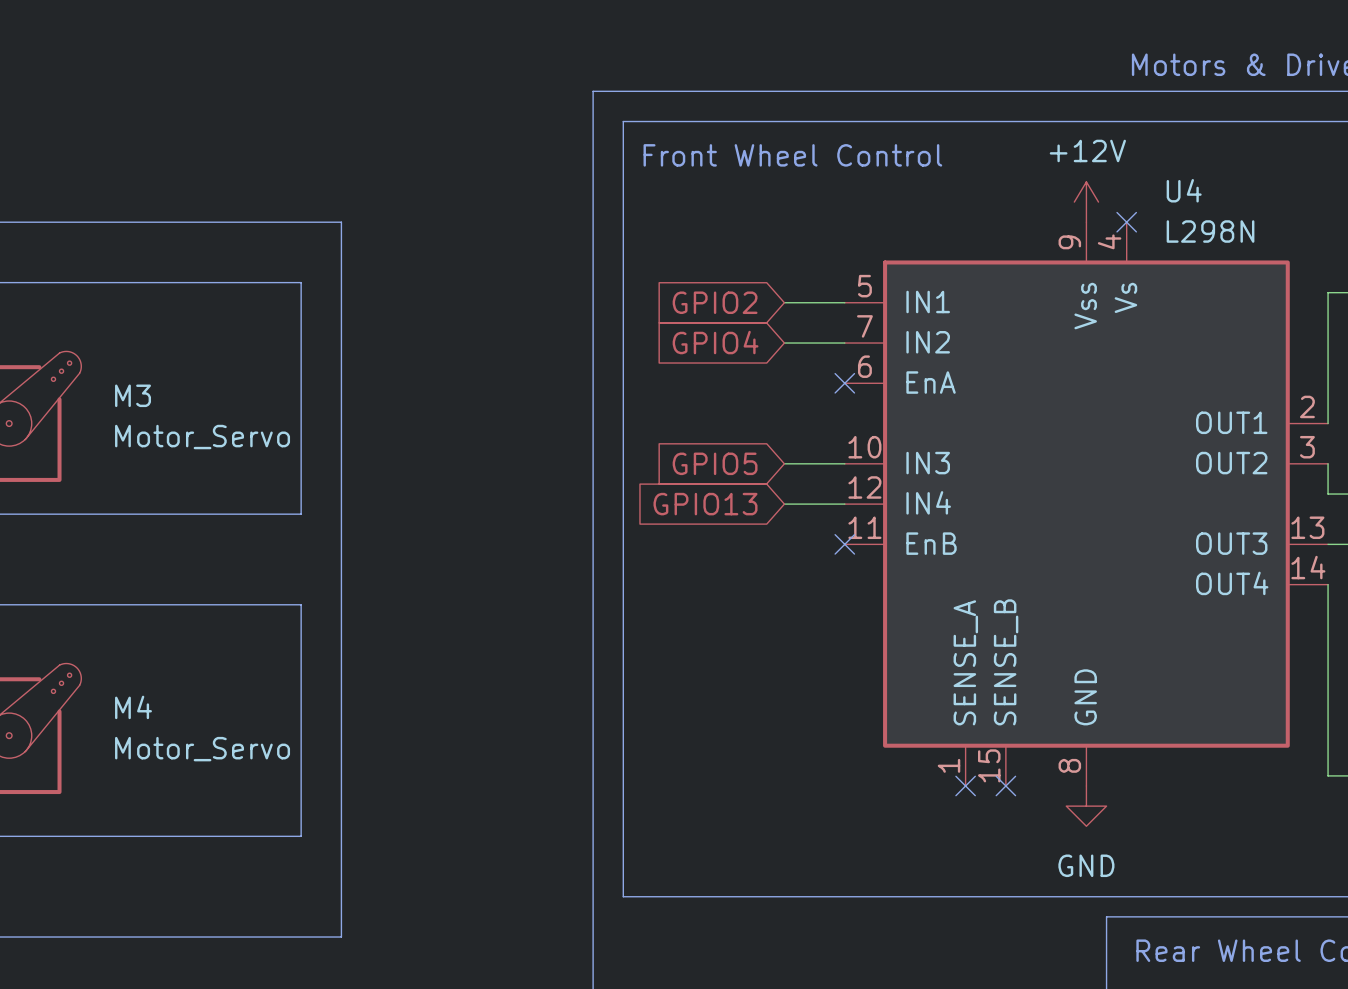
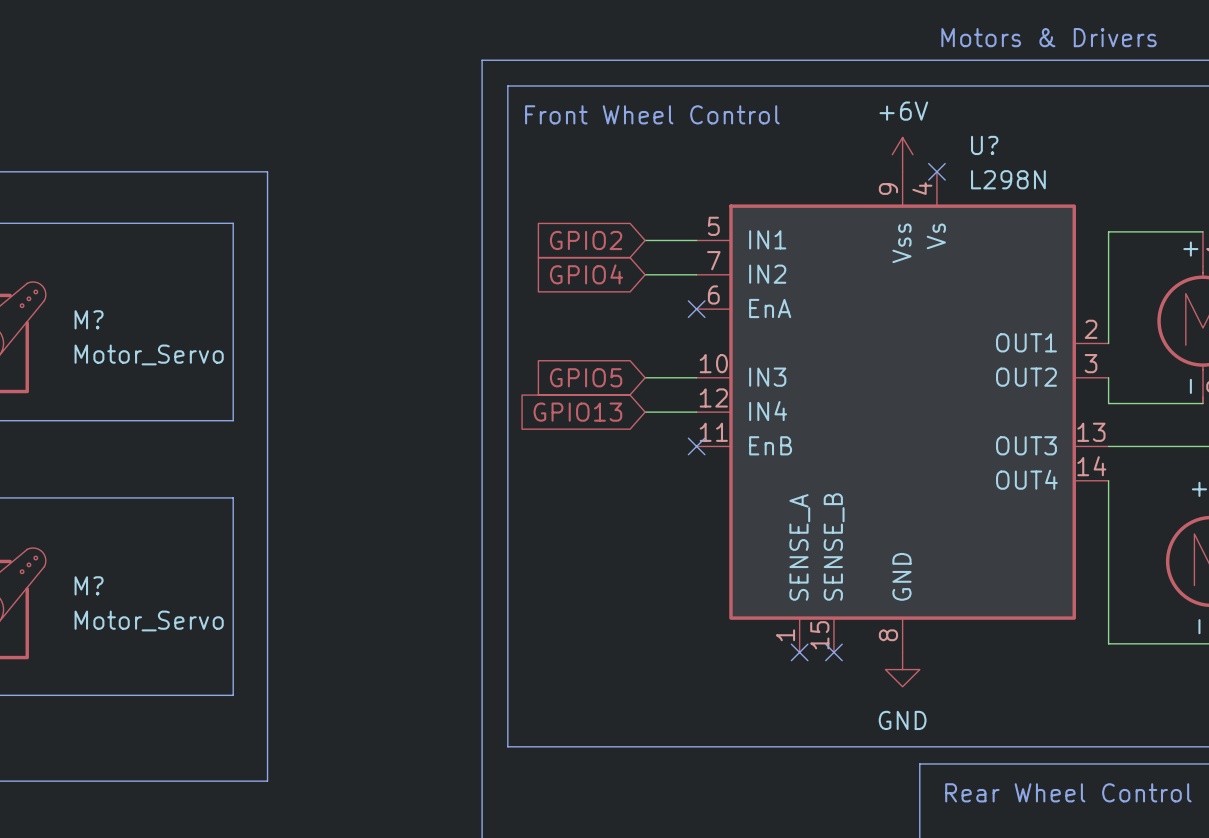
U4 name: U4 (1184, 190) -> U? (984, 145)
power symbol: +12V (1086, 202) -> +6V (902, 154)
M3 name: M3 (133, 395) -> M? (89, 319)
M4 name: M4 (133, 707) -> M? (89, 585)

